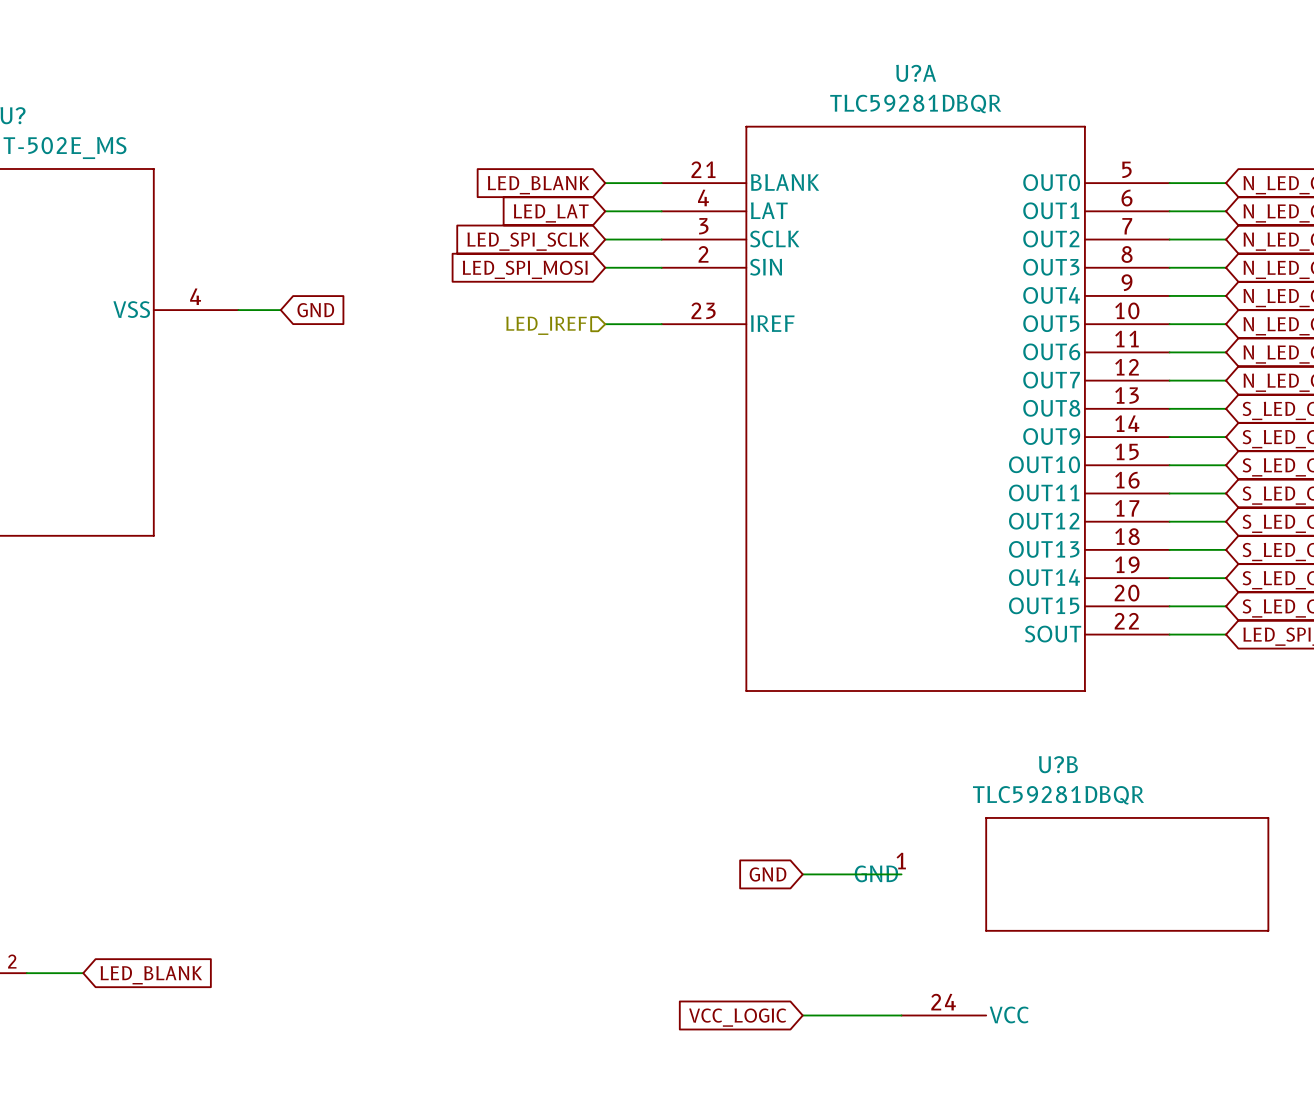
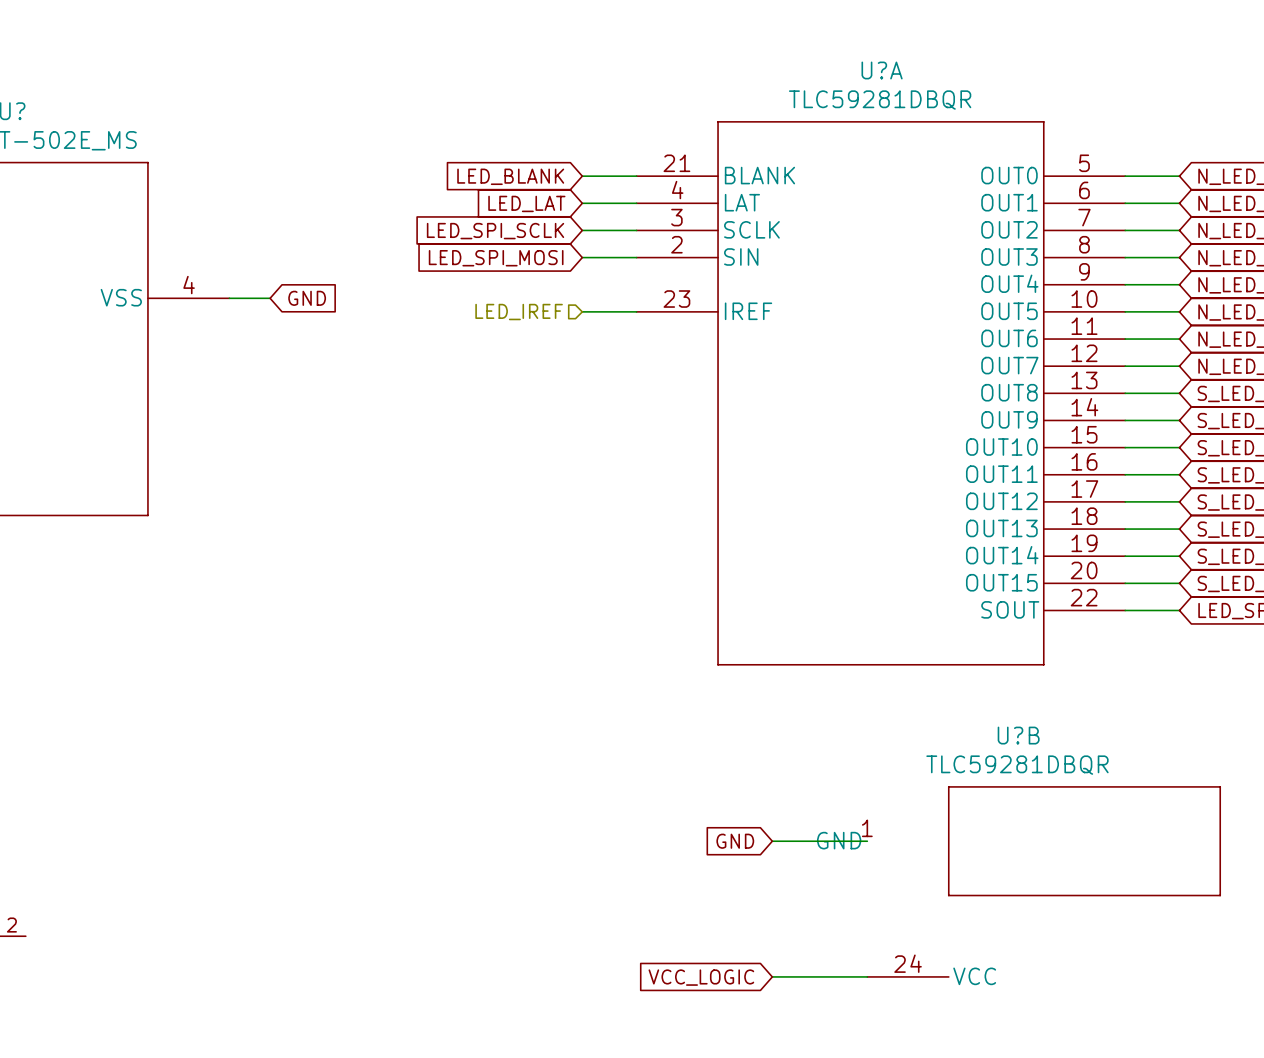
wire: (26, 973) (83, 973) -> none
global label: LED_BLANK (151, 975) -> none

